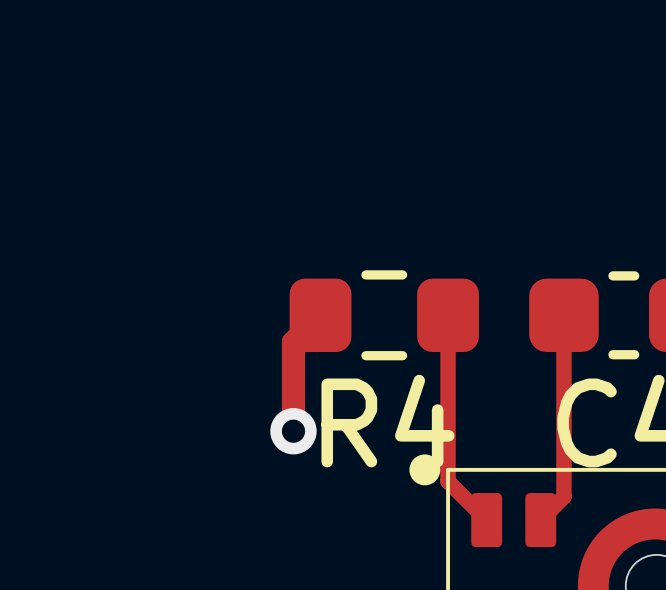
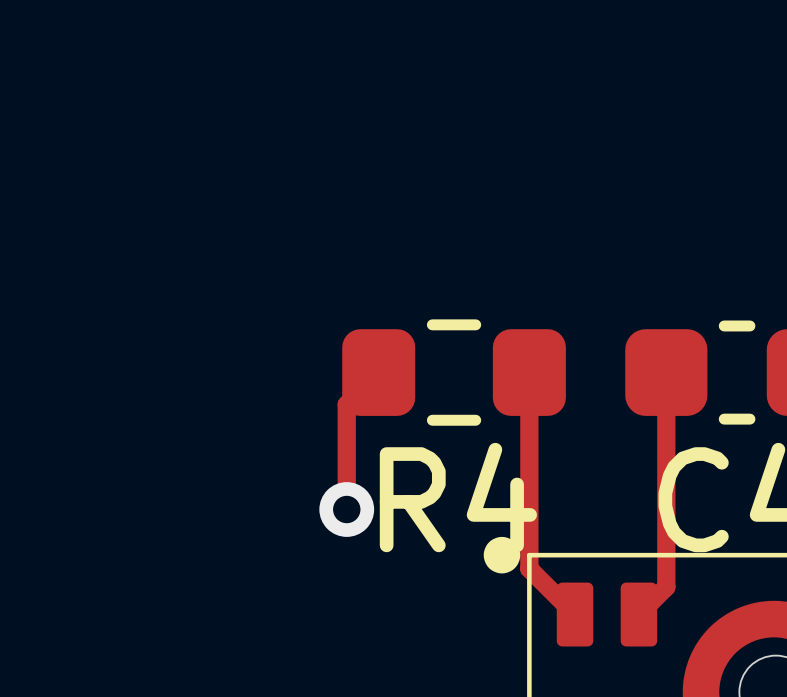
track width: thick (320, 315) (293, 342) (293, 431) -> thin (378, 372) (346, 404) (346, 509)

